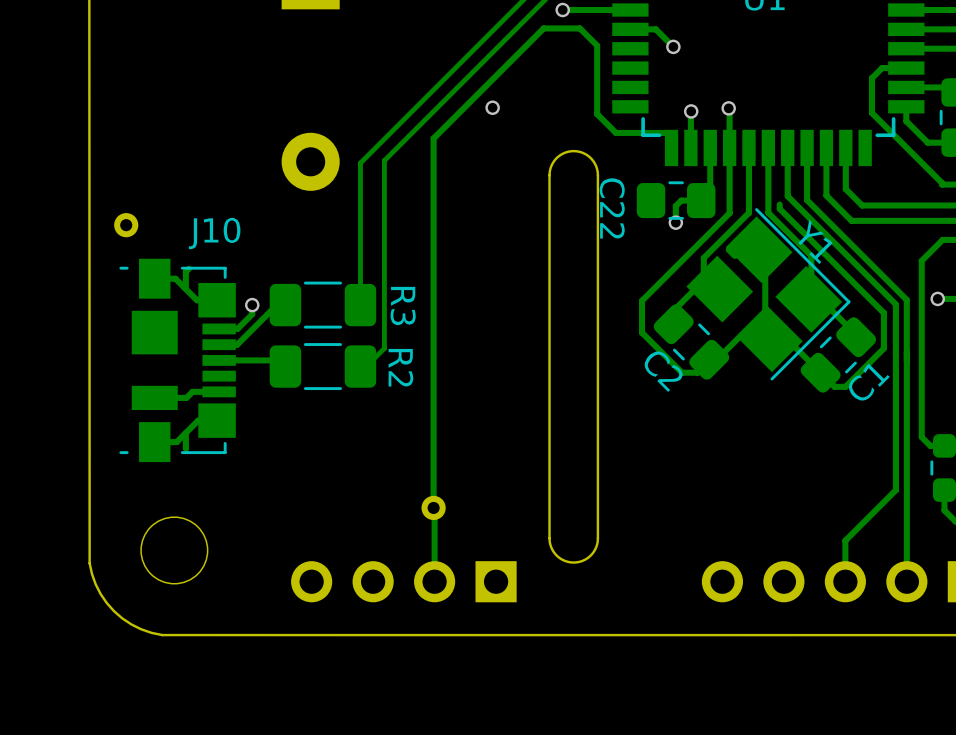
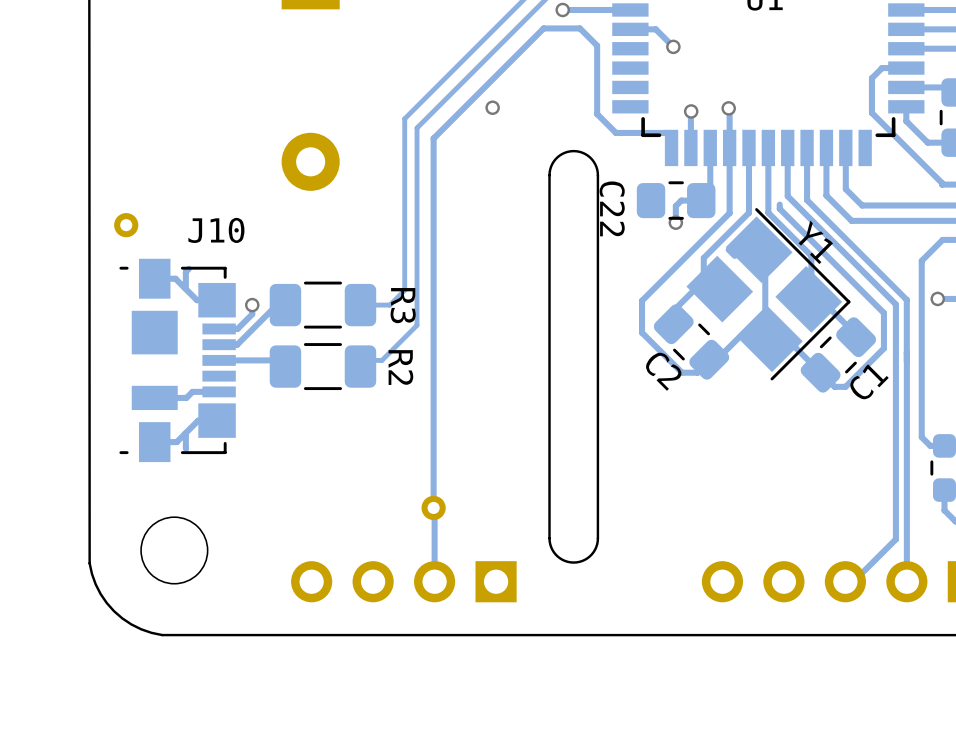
track: (404, 118) (360, 163) (360, 298) -> (404, 118) (404, 290) (389, 305) (360, 305)
track: (417, 128) (384, 160) (384, 348) (372, 360) -> (417, 128) (417, 325) (381, 360) (372, 360)
track: (895, 490) (845, 540) (845, 581) -> (895, 490) (895, 539) (853, 581) (845, 581)

